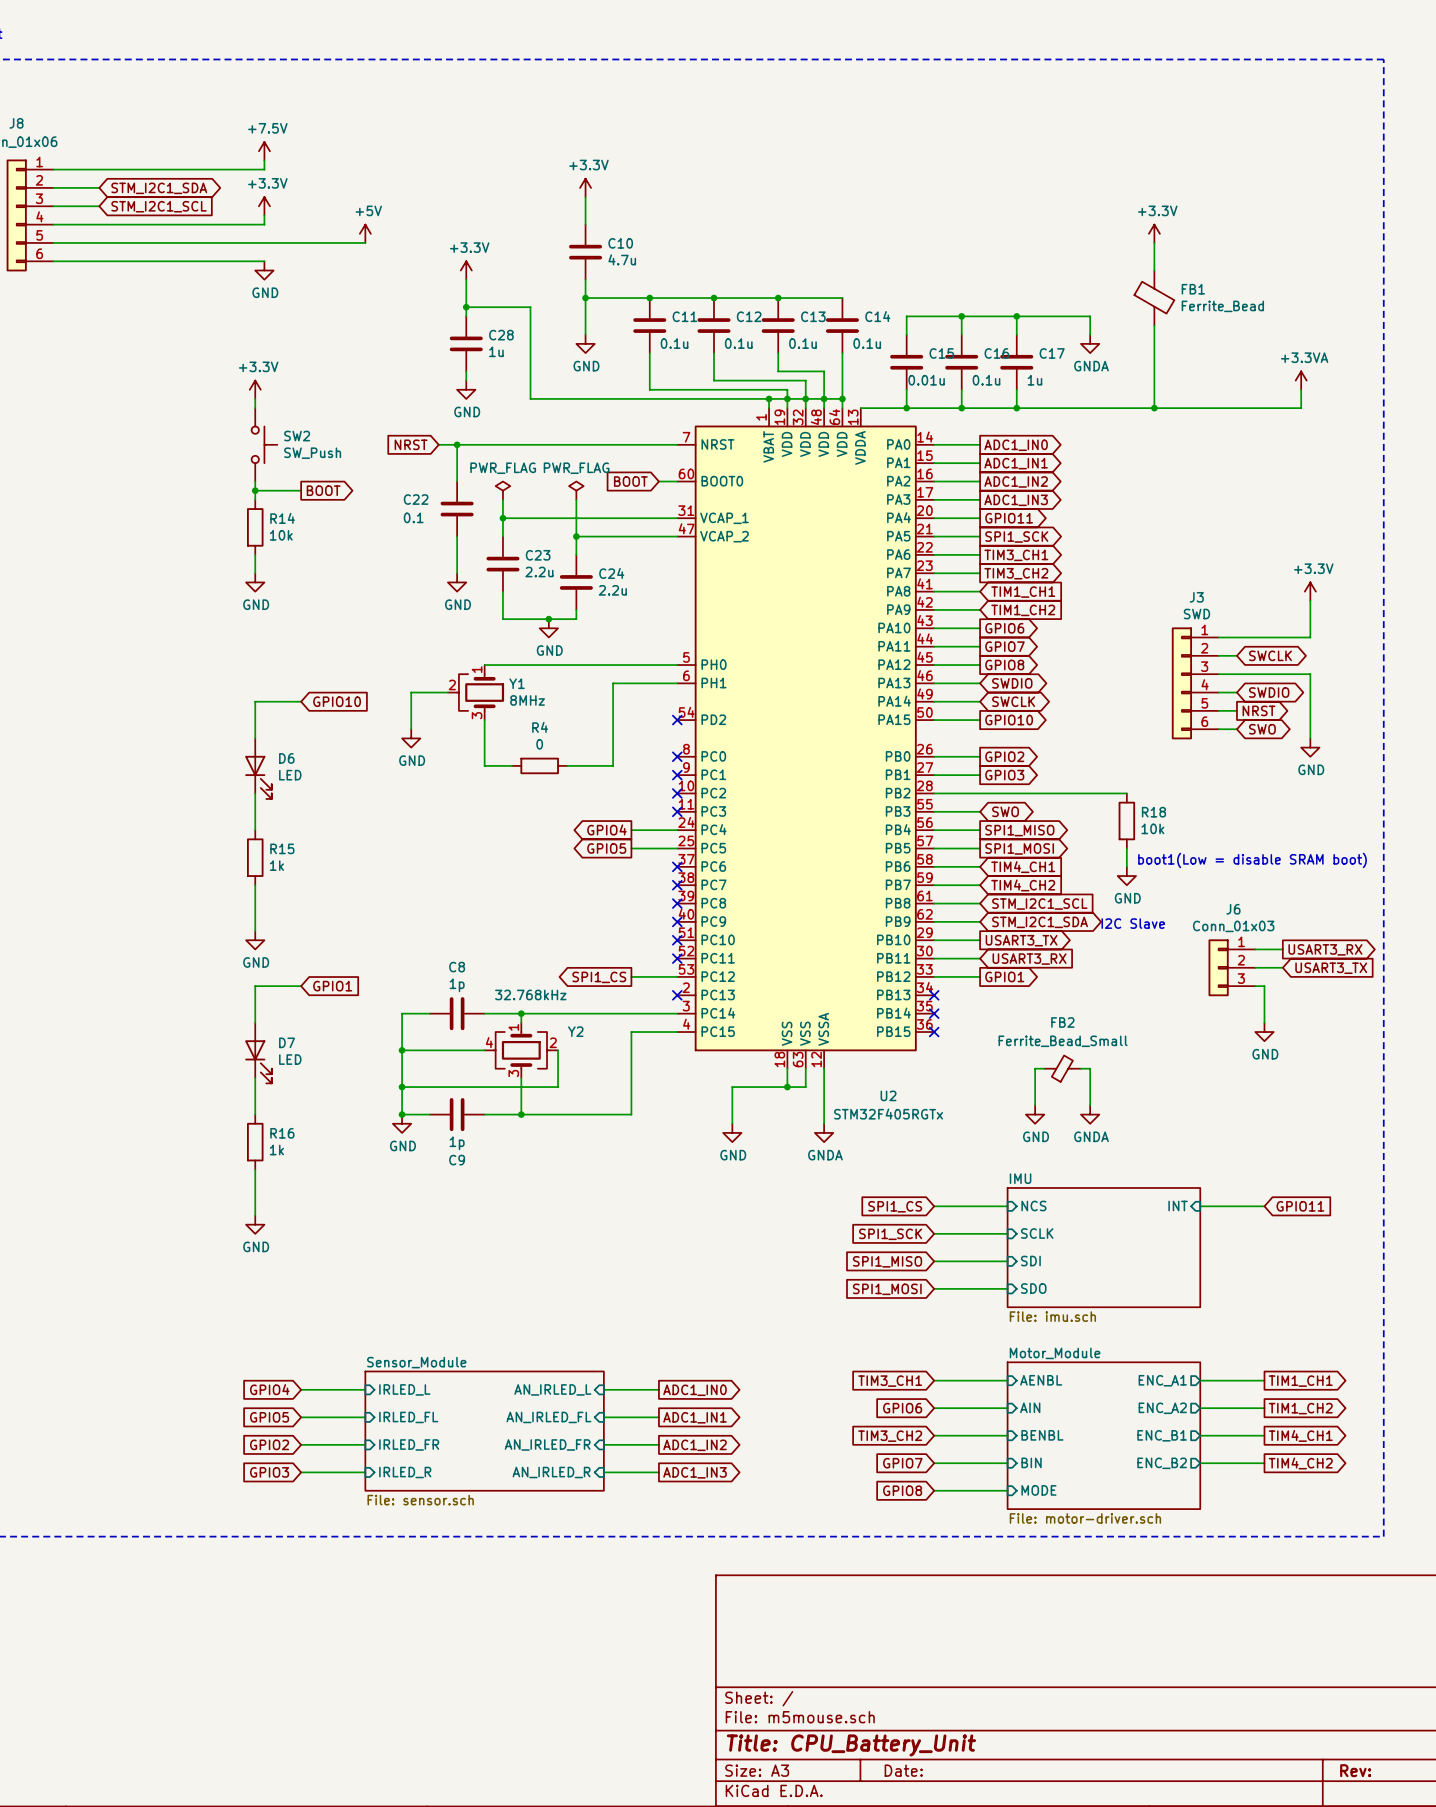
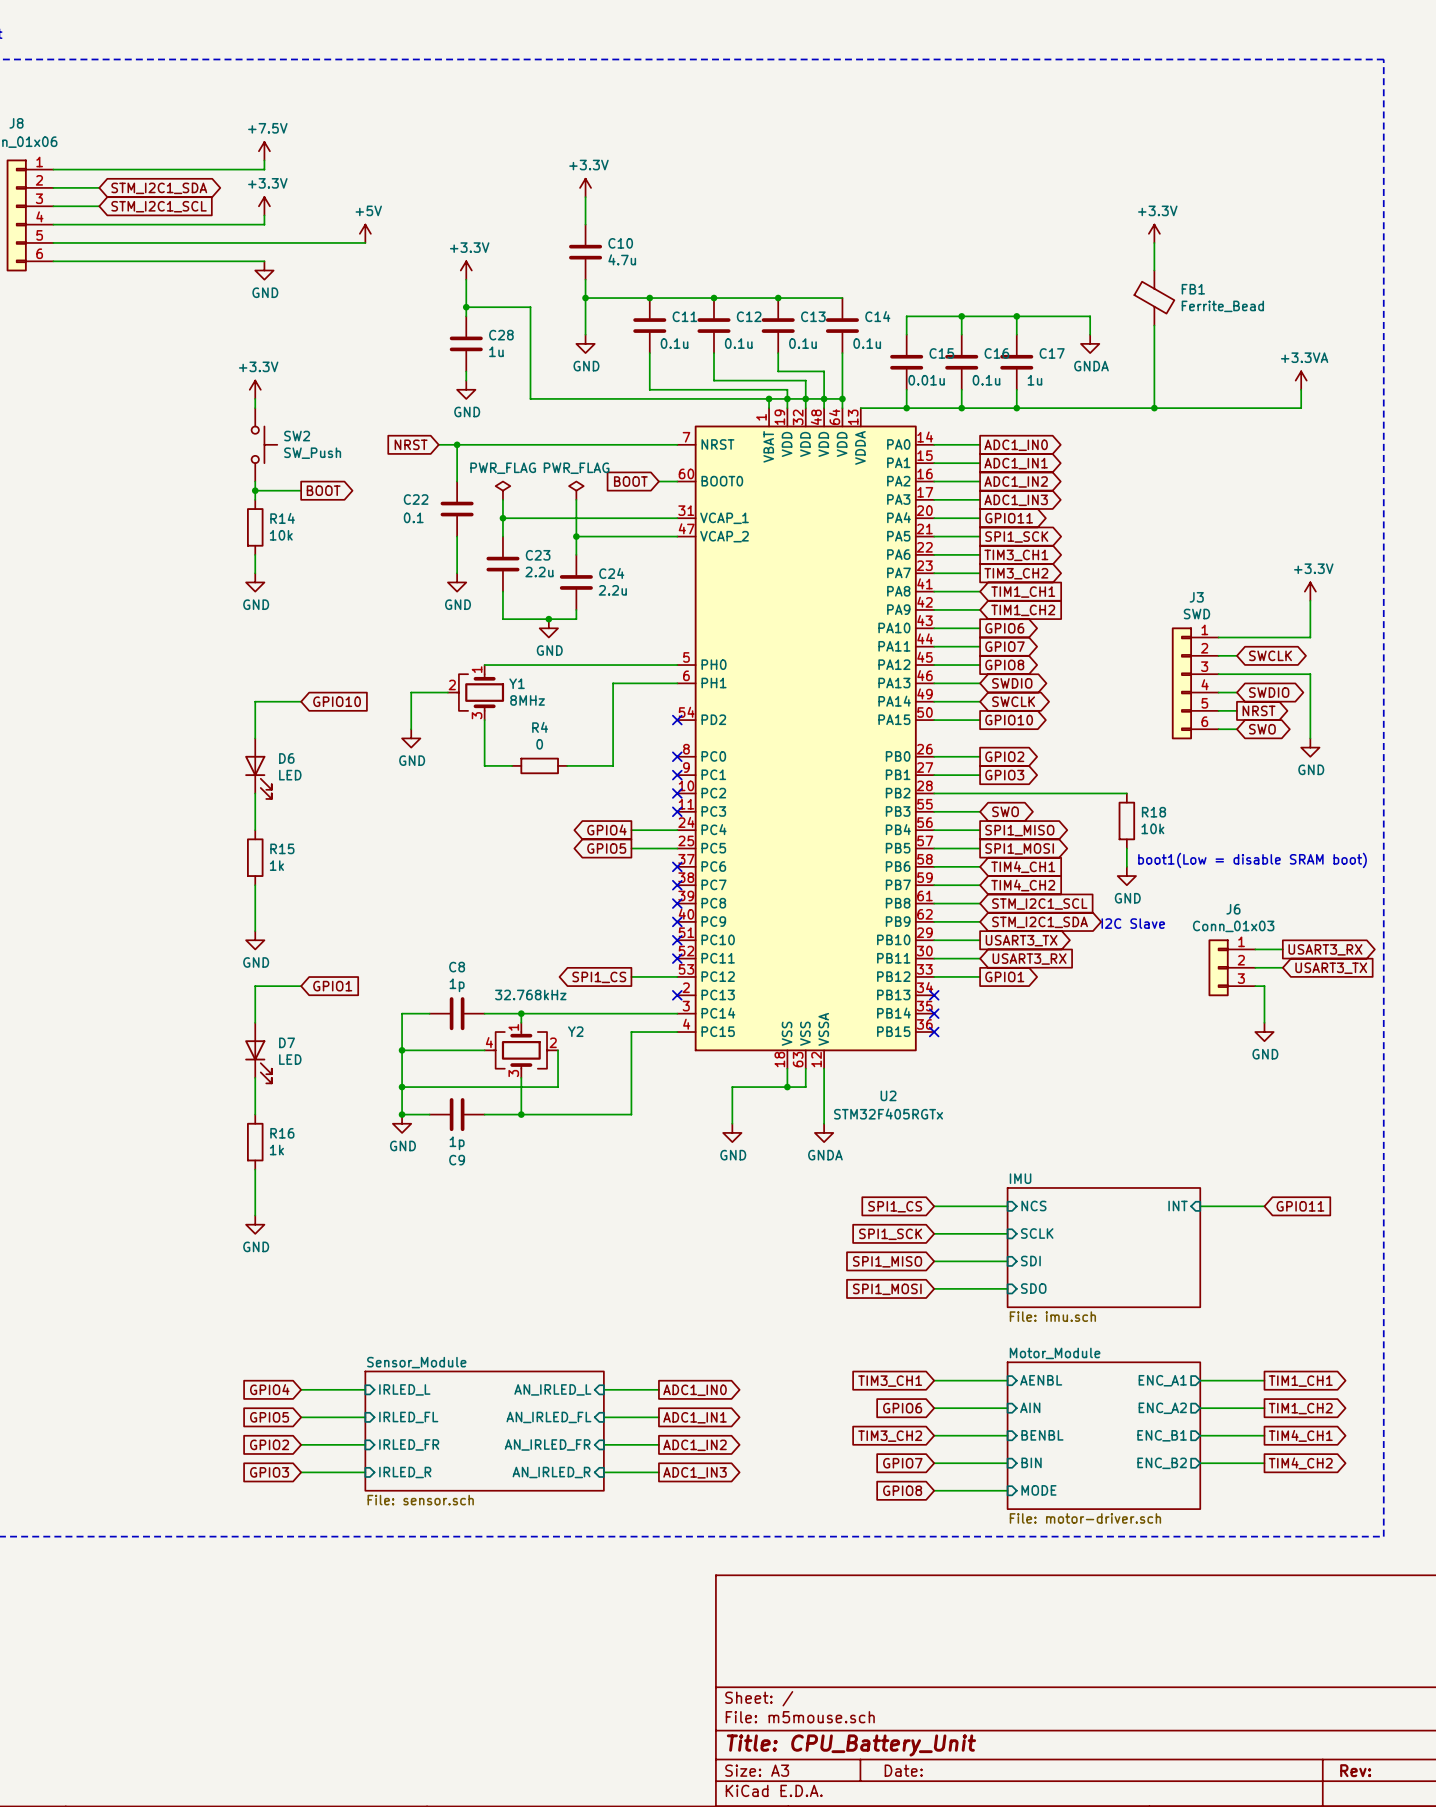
wire: (1044, 1068) (1035, 1068) (1035, 1105) -> none
FB2: Ferrite_Bead_Small (1062, 1068) -> none
wire: (1080, 1068) (1090, 1068) (1090, 1105) -> none
power symbol: GND (1035, 1114) -> none
power symbol: GNDA (1090, 1114) -> none

